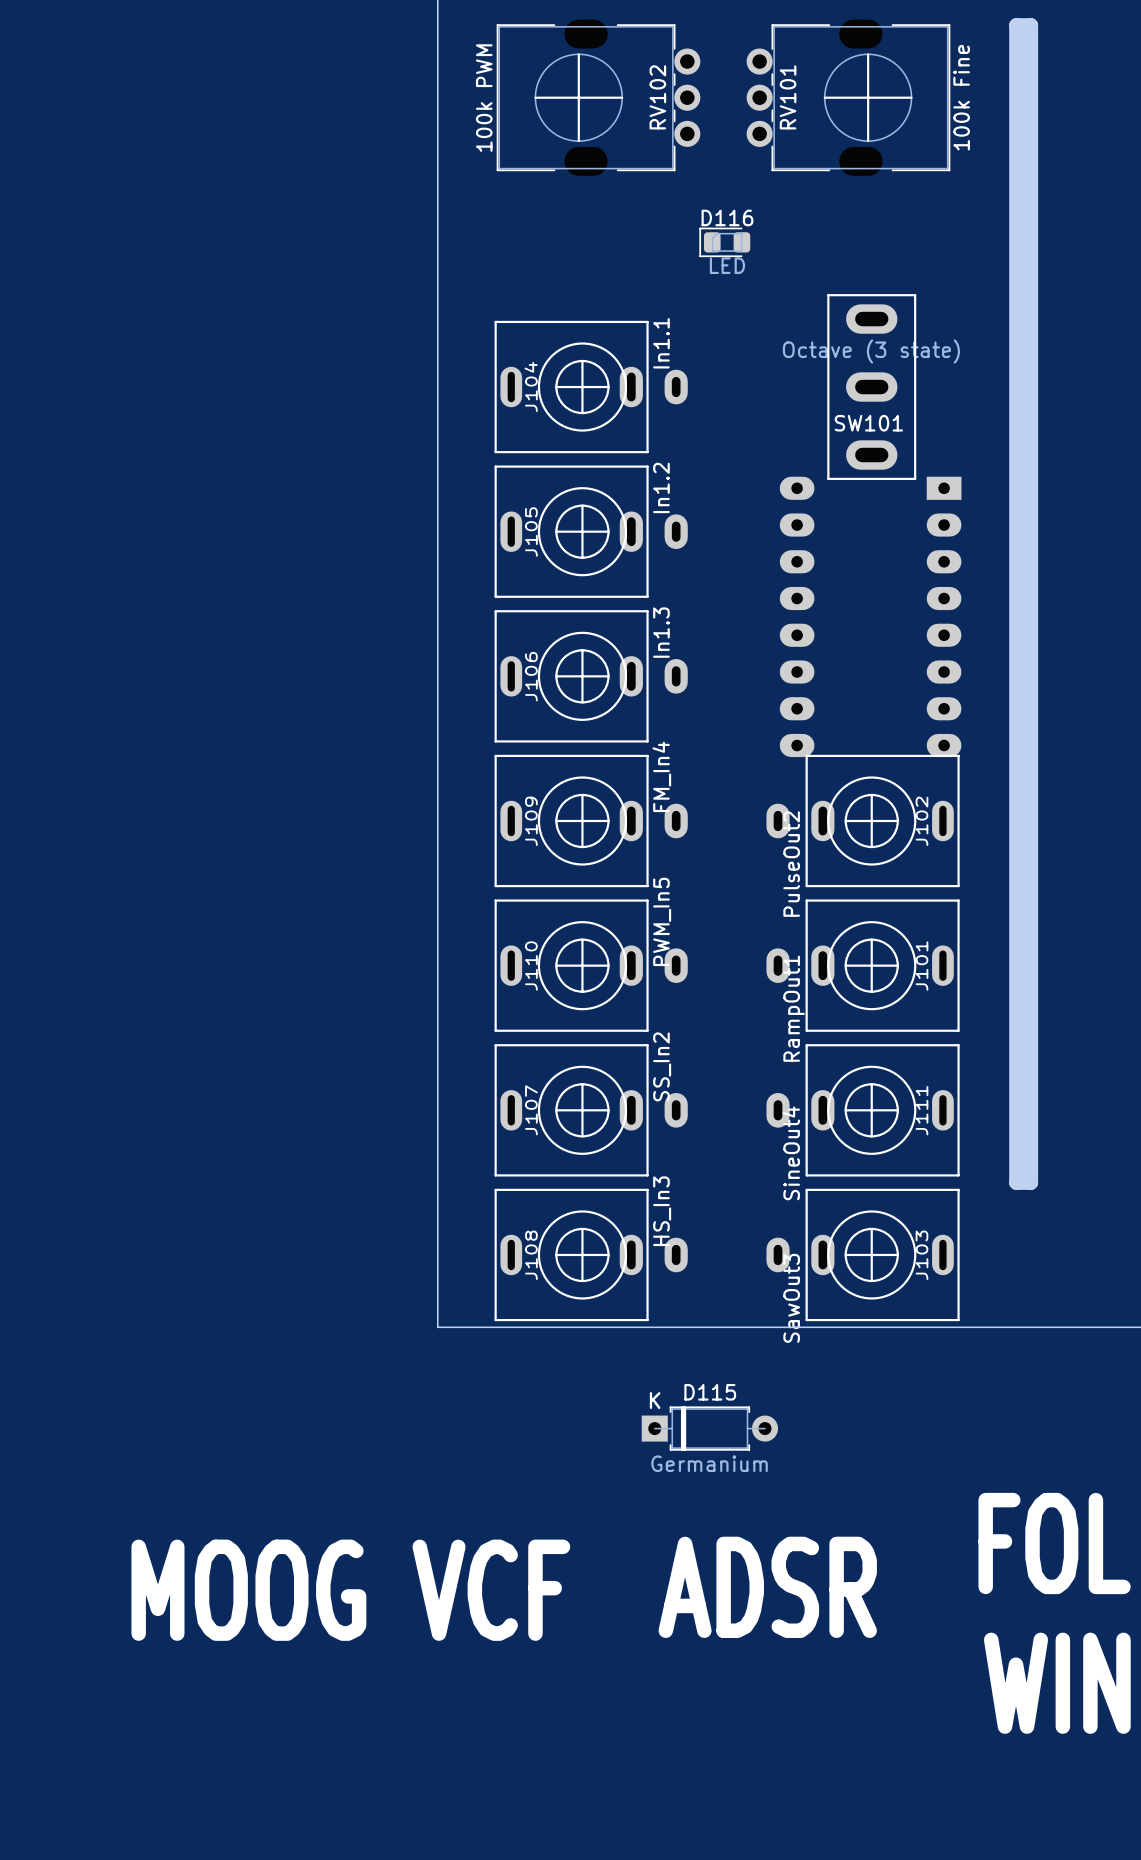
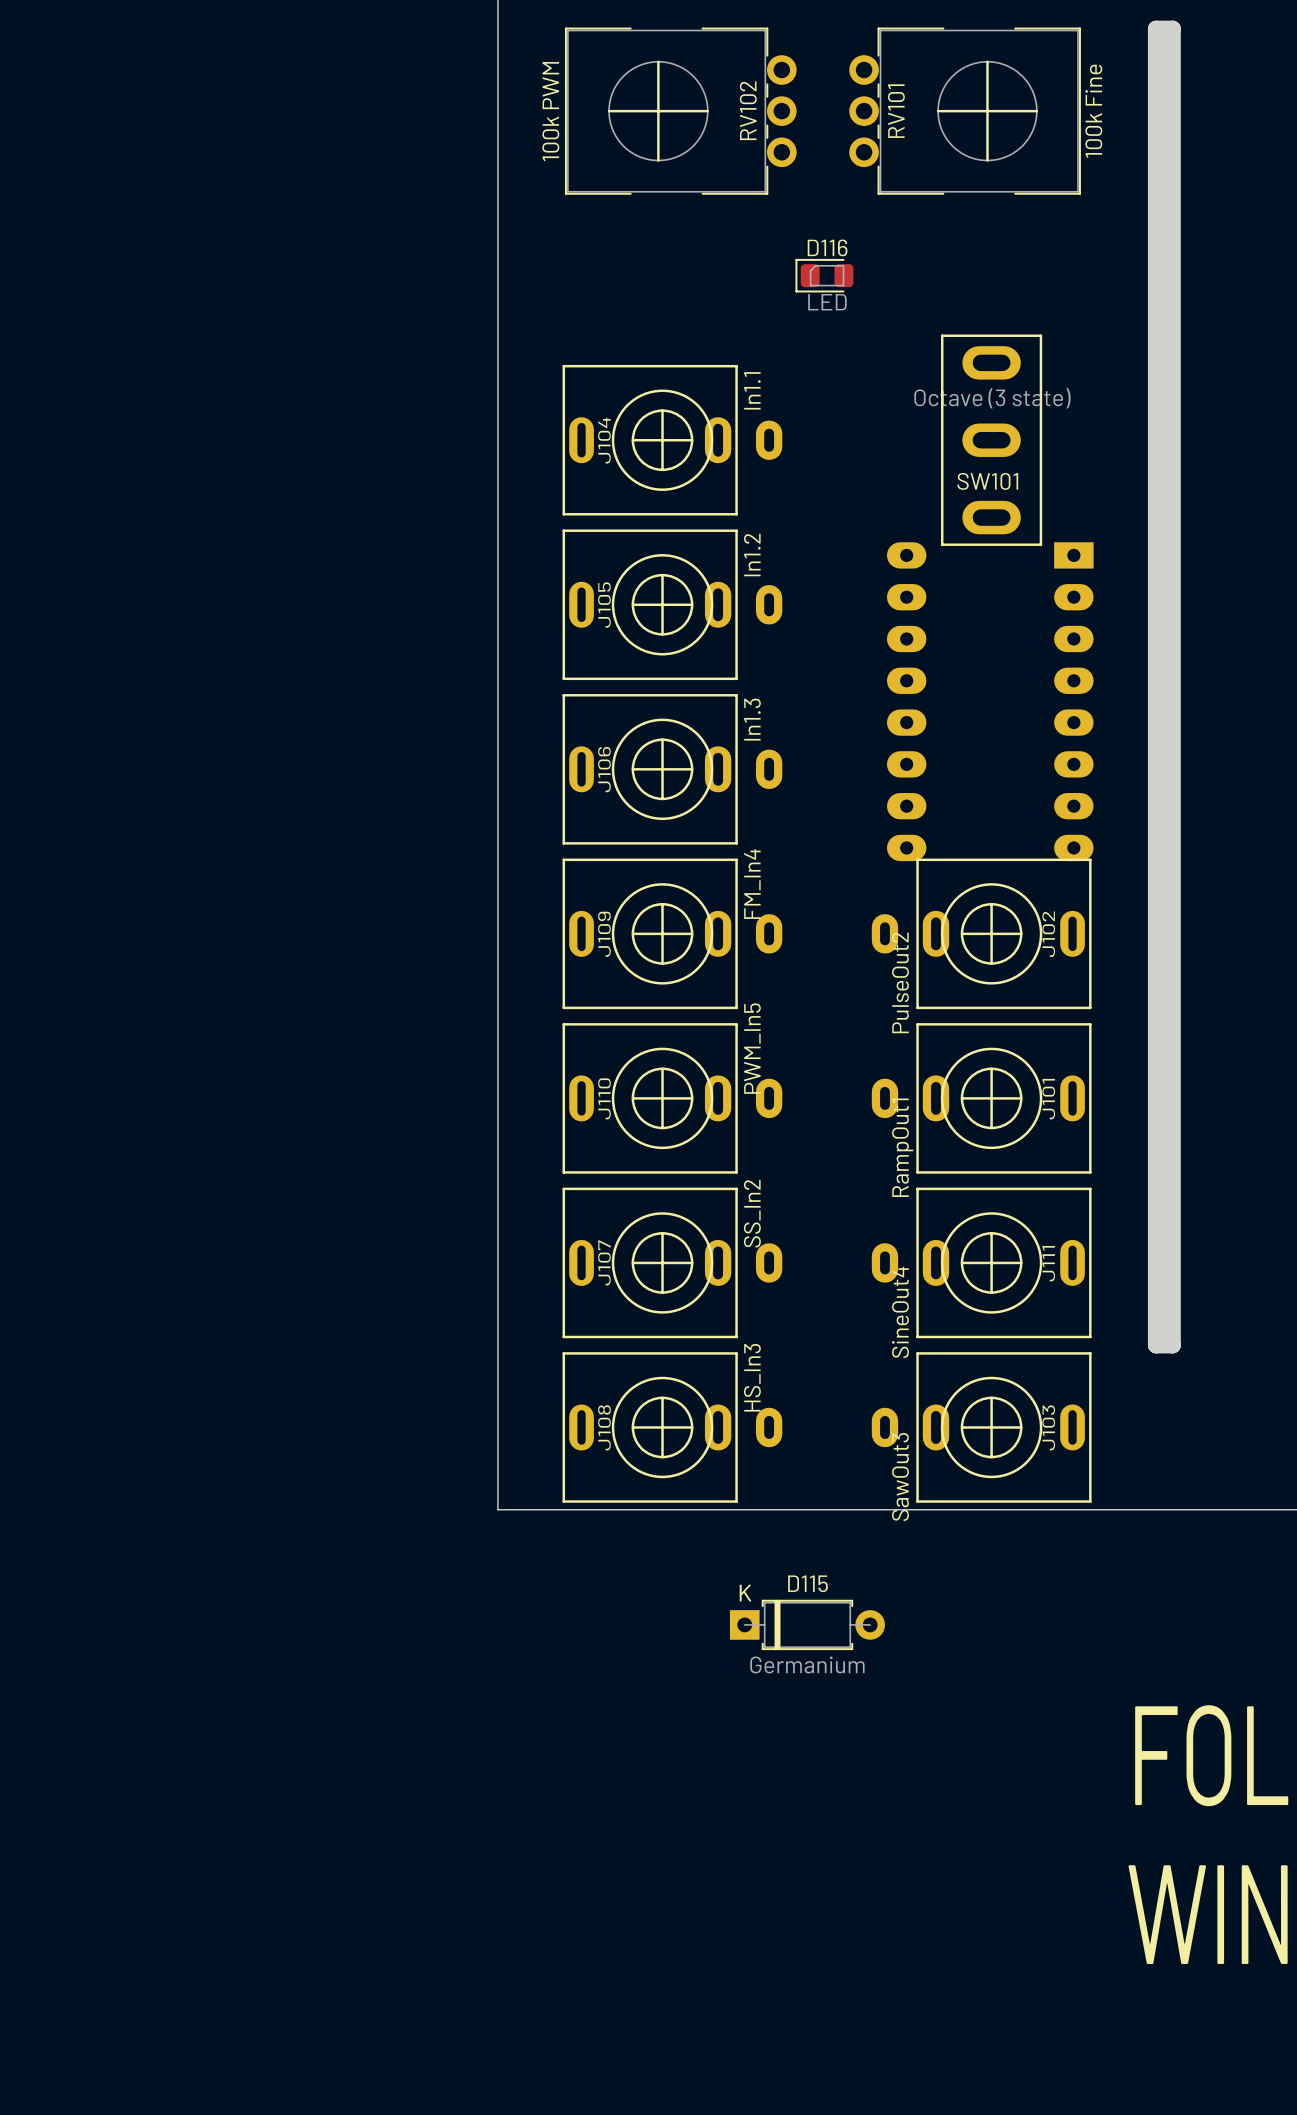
text: ADSR (767, 1587) -> none
text: MOOG VCF (350, 1590) -> none

